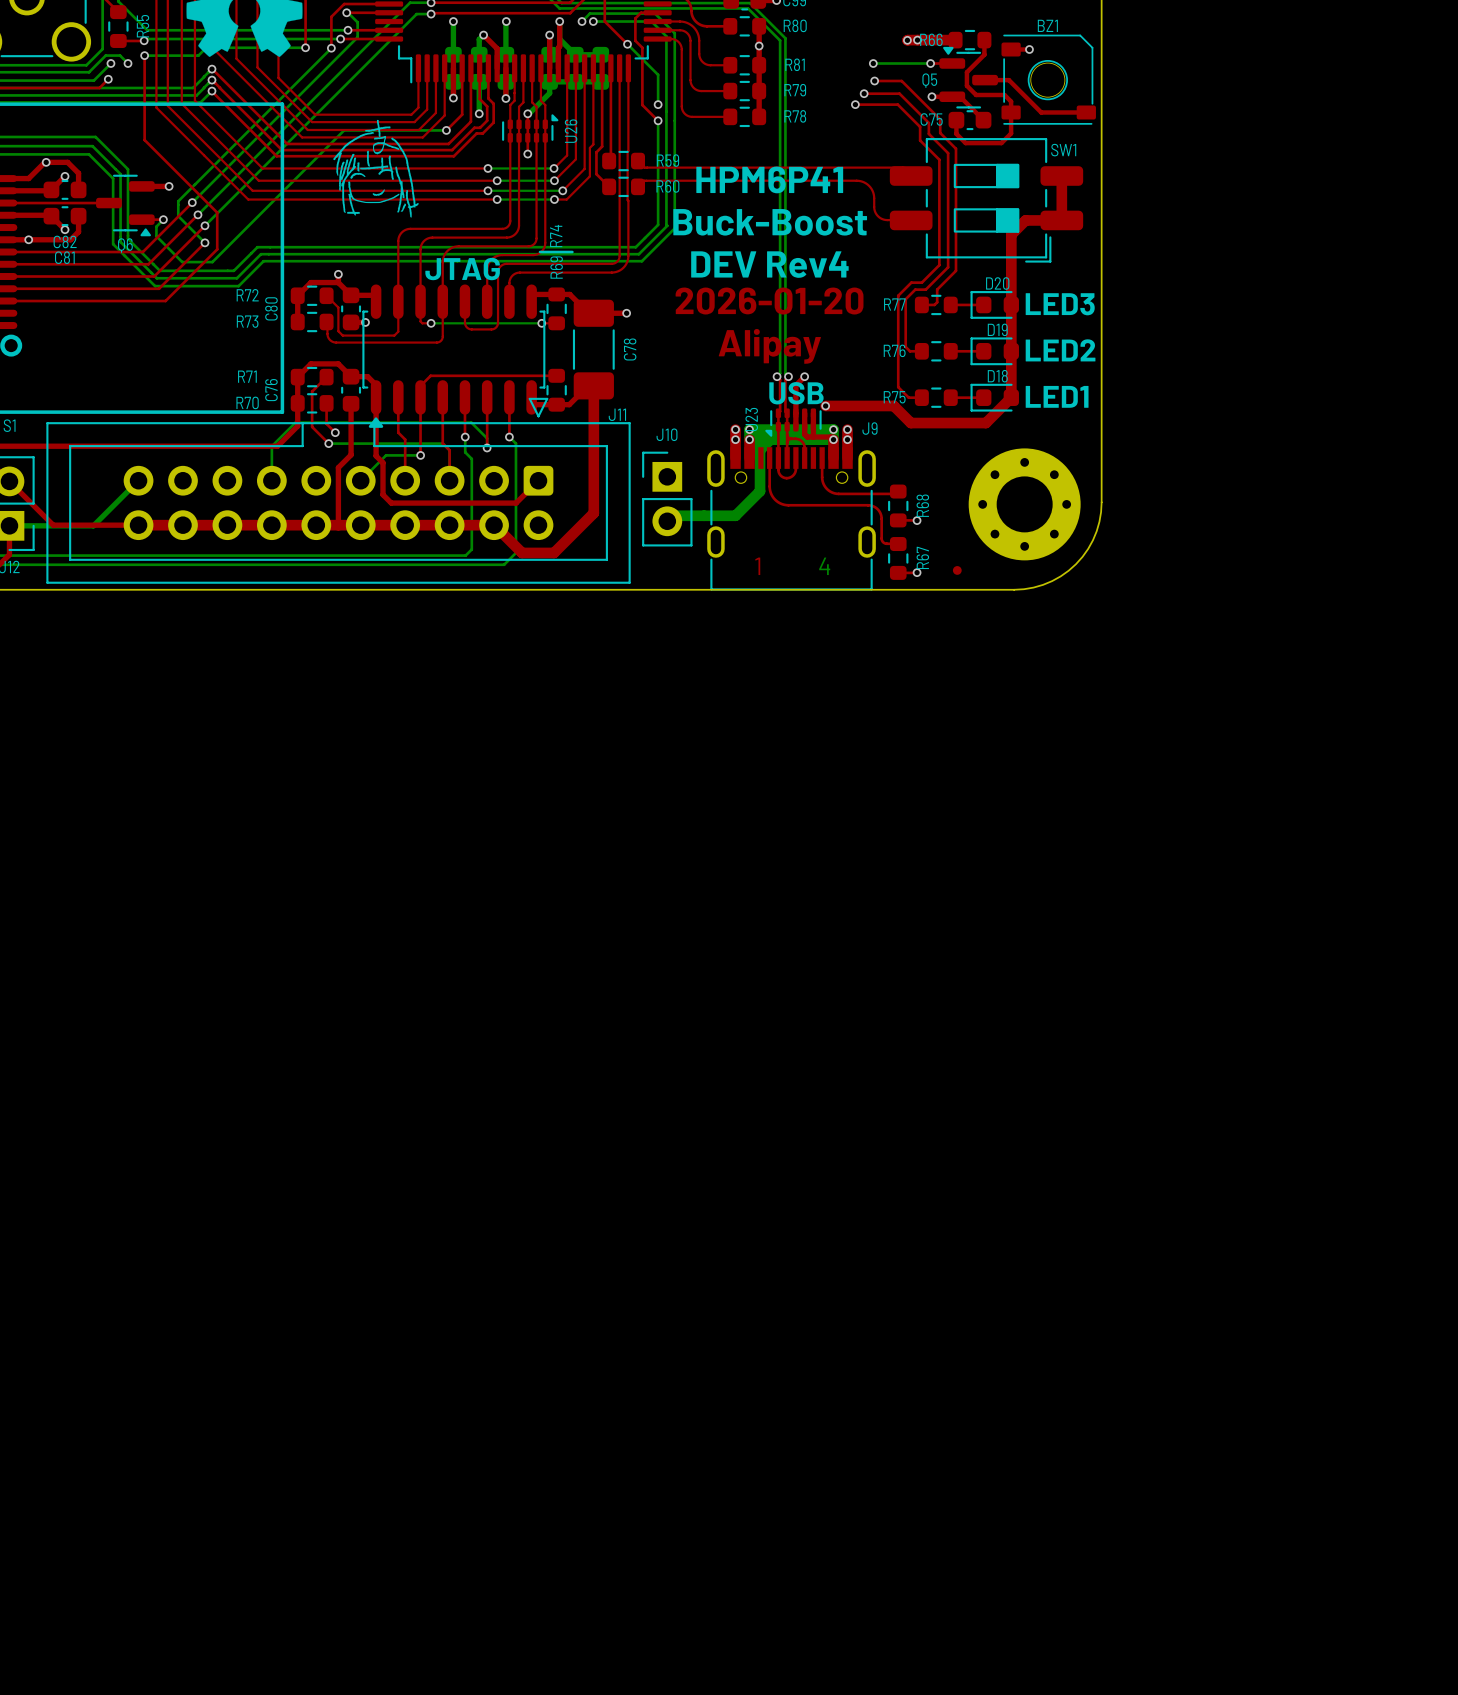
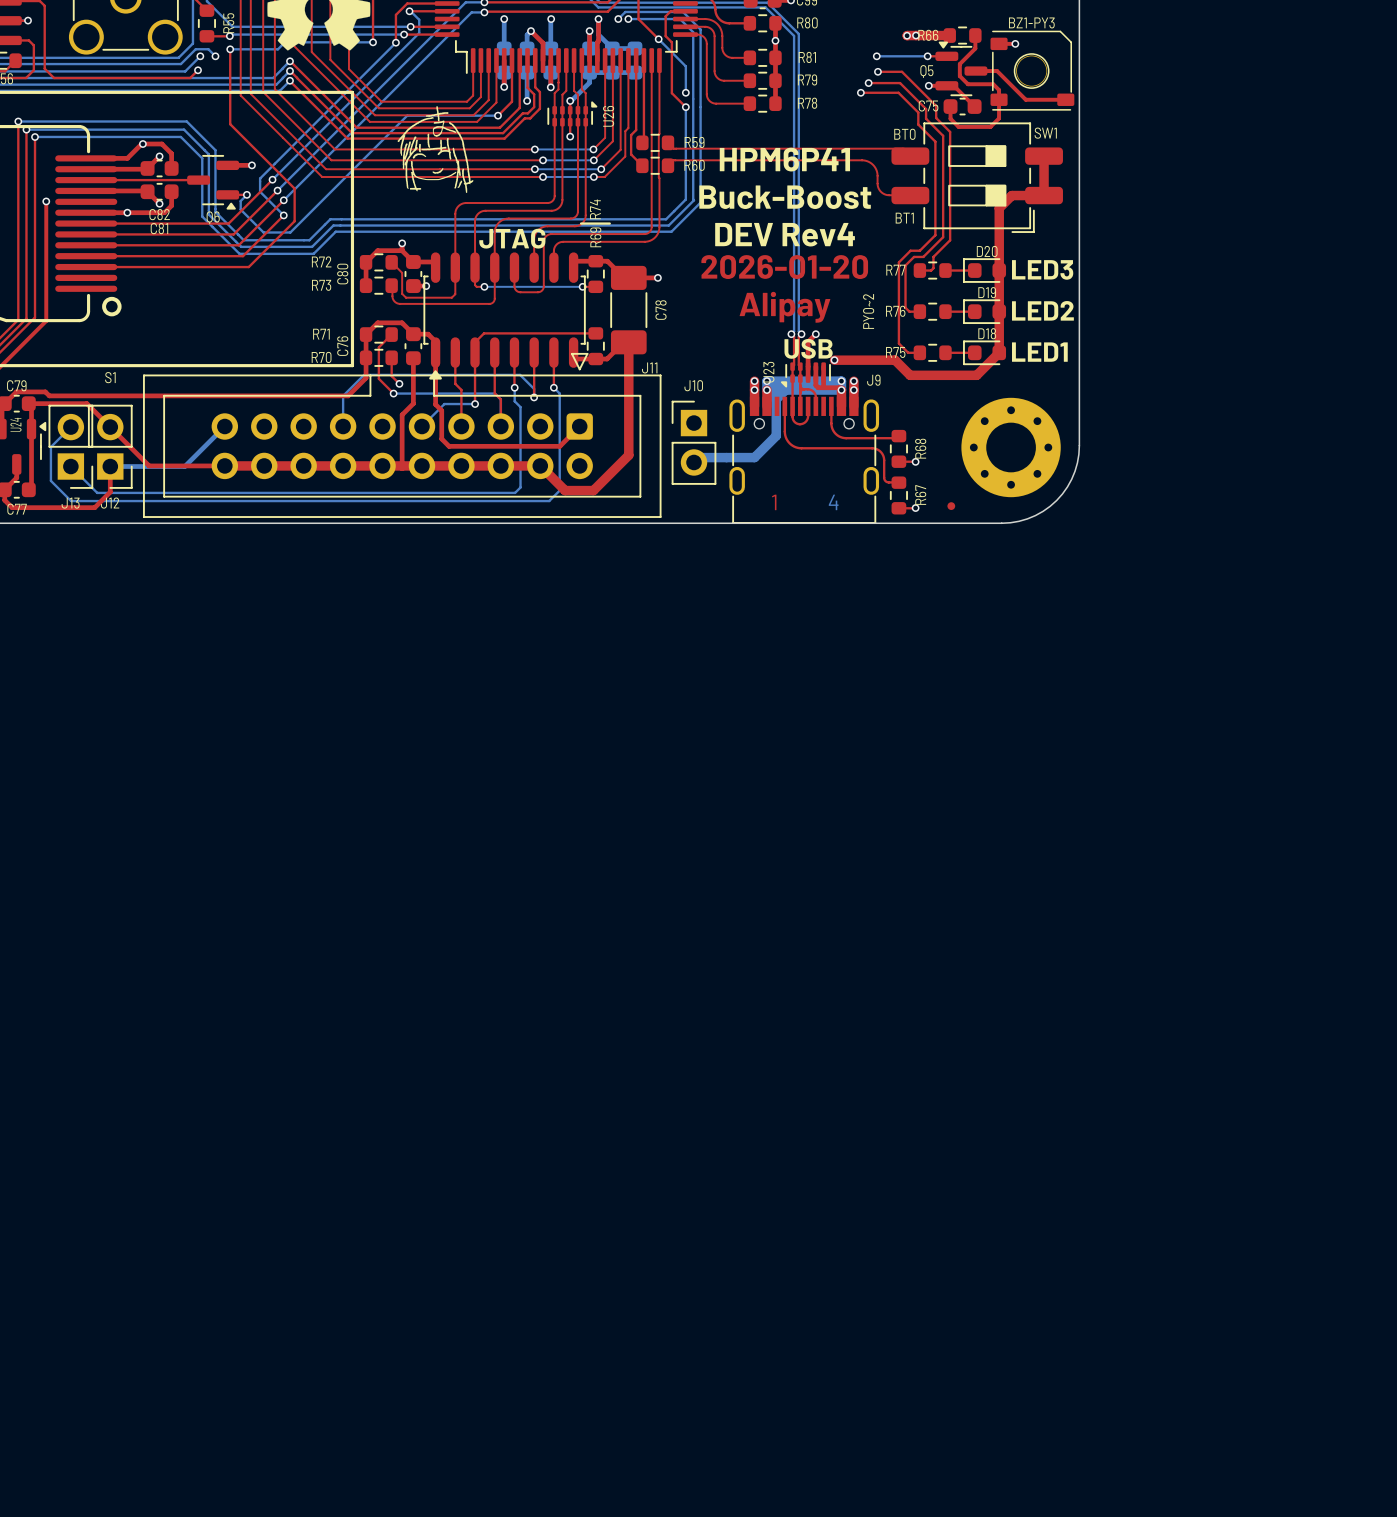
BZ1 name: BZ1 (1047, 25) -> BZ1-PY3 (1031, 22)
text: none -> BT0 (904, 134)
text: none -> BT1 (904, 218)
text: none -> PY0~2 (868, 311)

